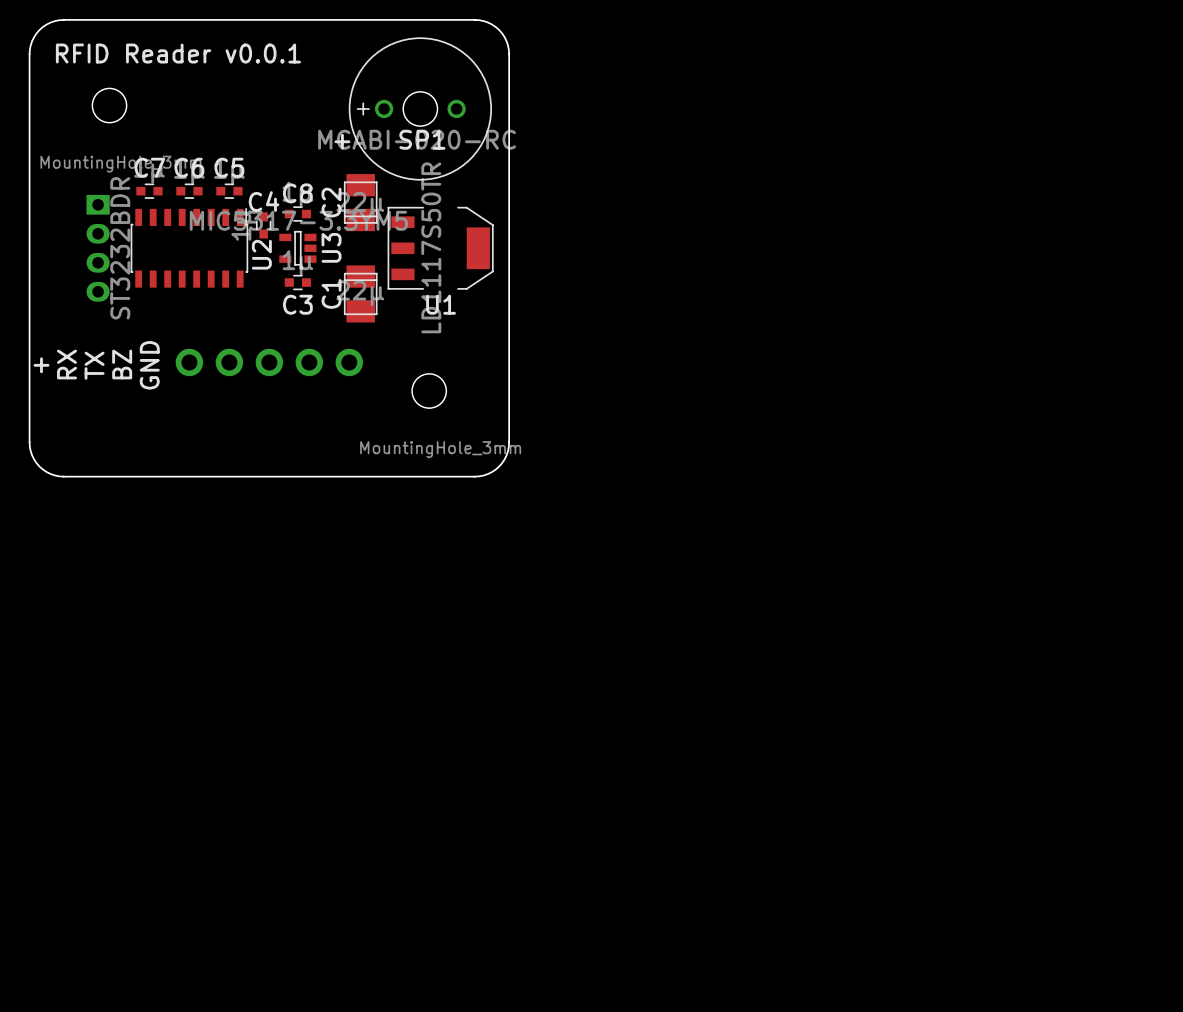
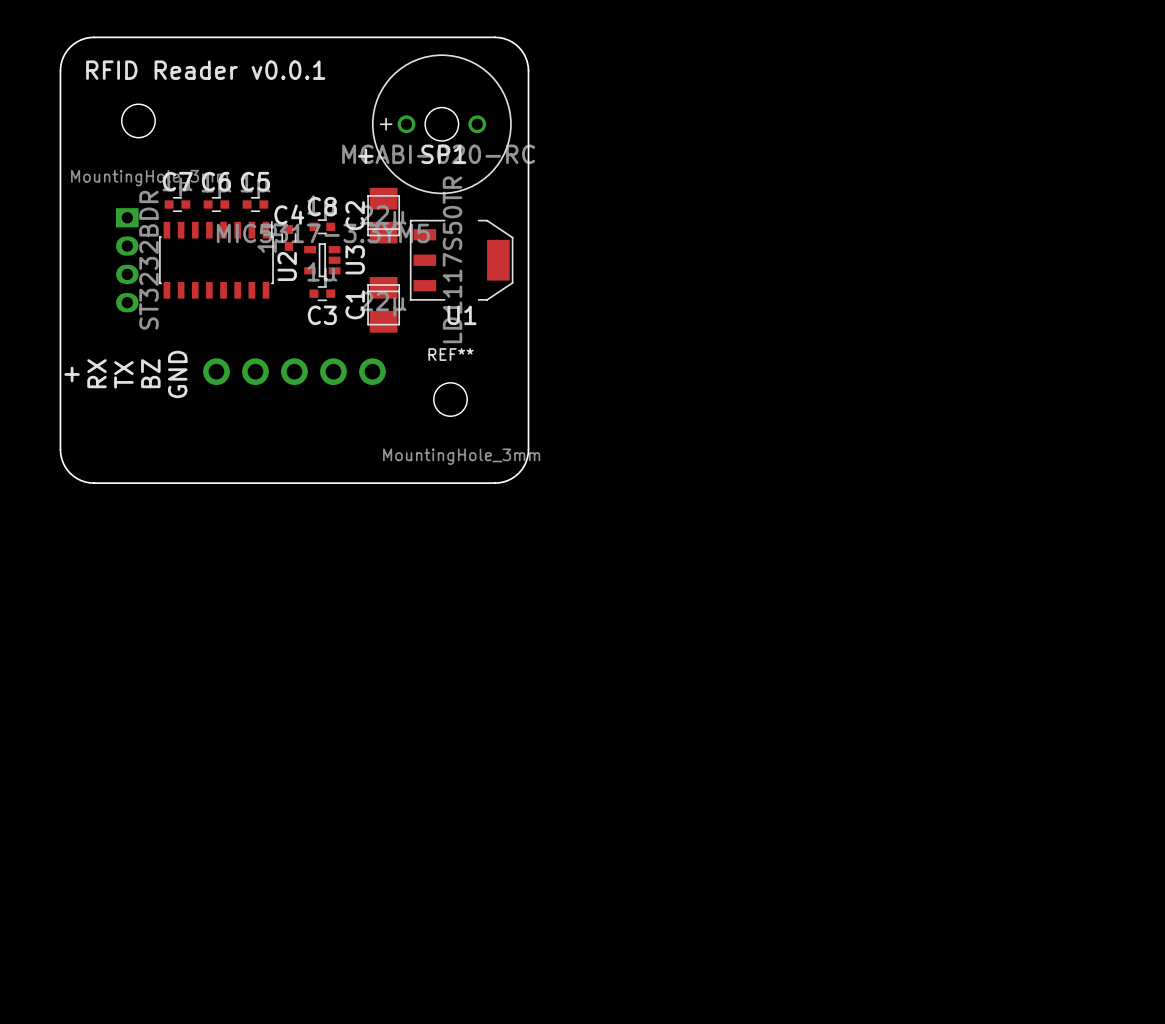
REF** name: none -> REF** (451, 354)

